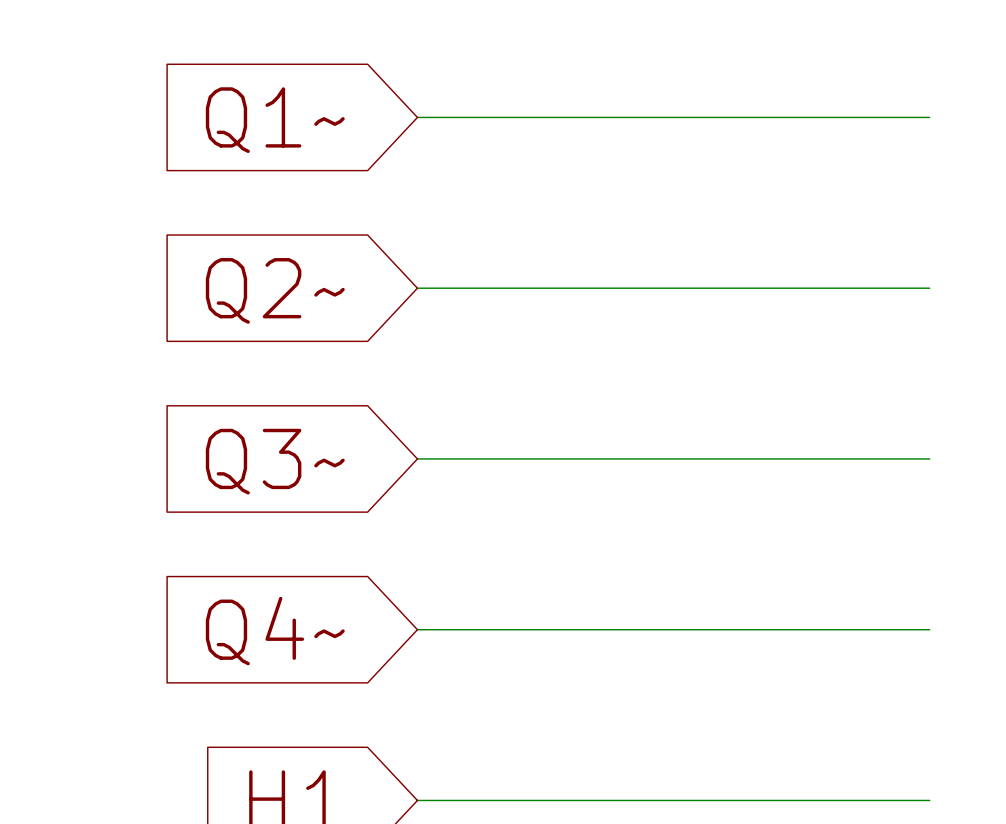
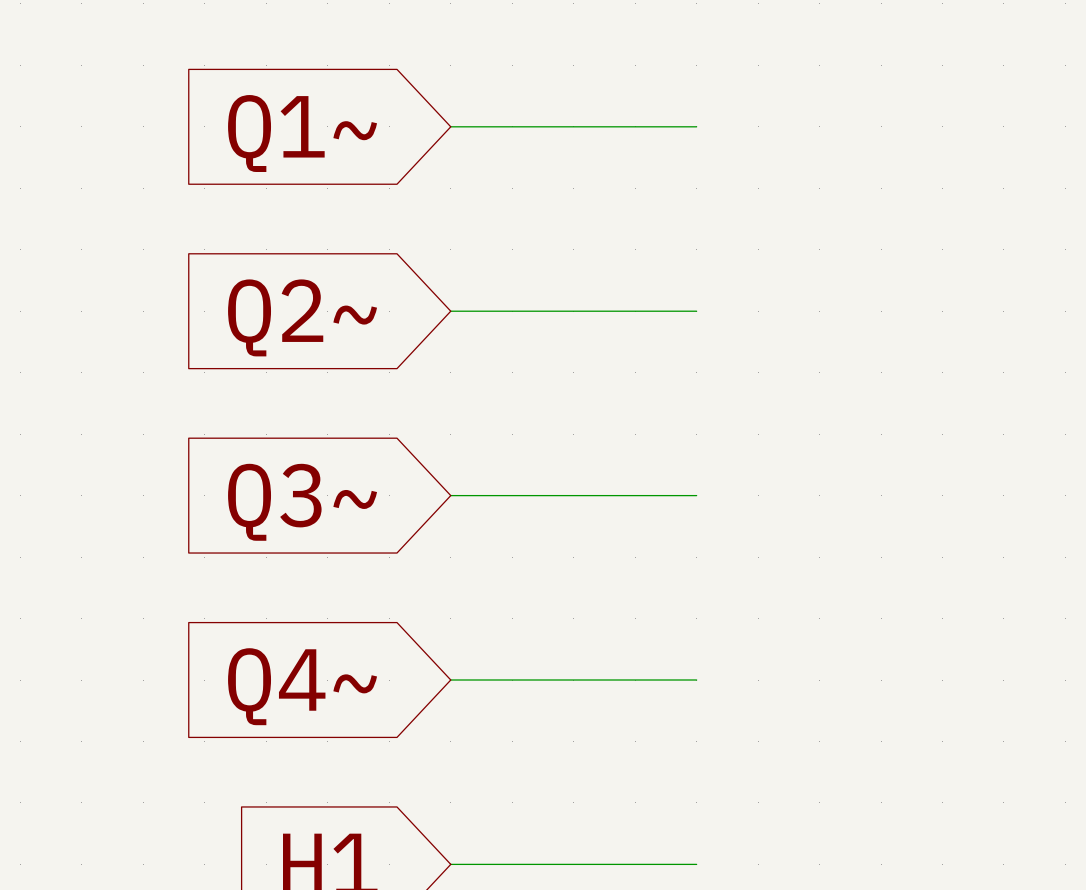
wire: (645, 117) (929, 117) -> none
wire: (645, 288) (929, 288) -> none
wire: (645, 458) (929, 458) -> none
wire: (645, 629) (929, 629) -> none
wire: (645, 800) (929, 800) -> none

